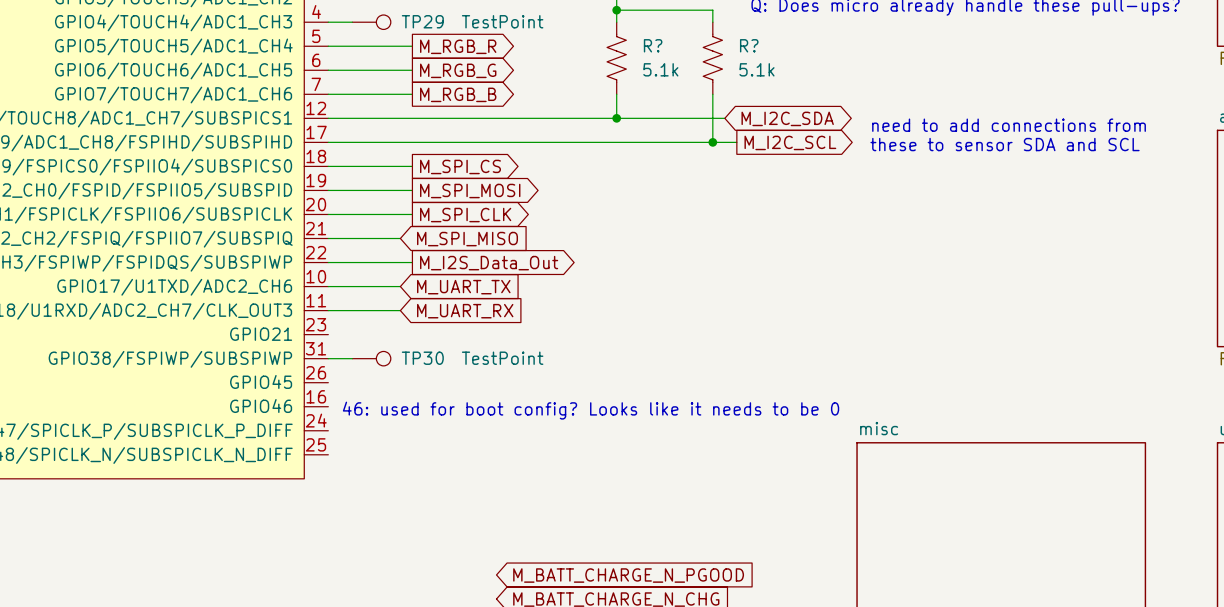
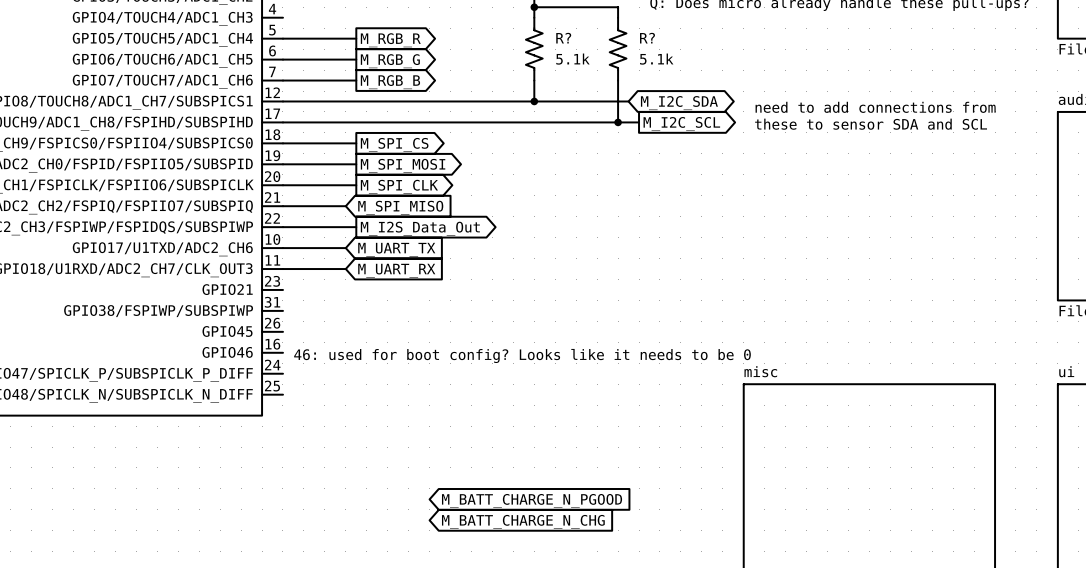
wire: (328, 22) (352, 22) -> none
TP29: TestPoint (371, 22) -> none
wire: (328, 358) (352, 358) -> none
TP30: TestPoint (371, 358) -> none

